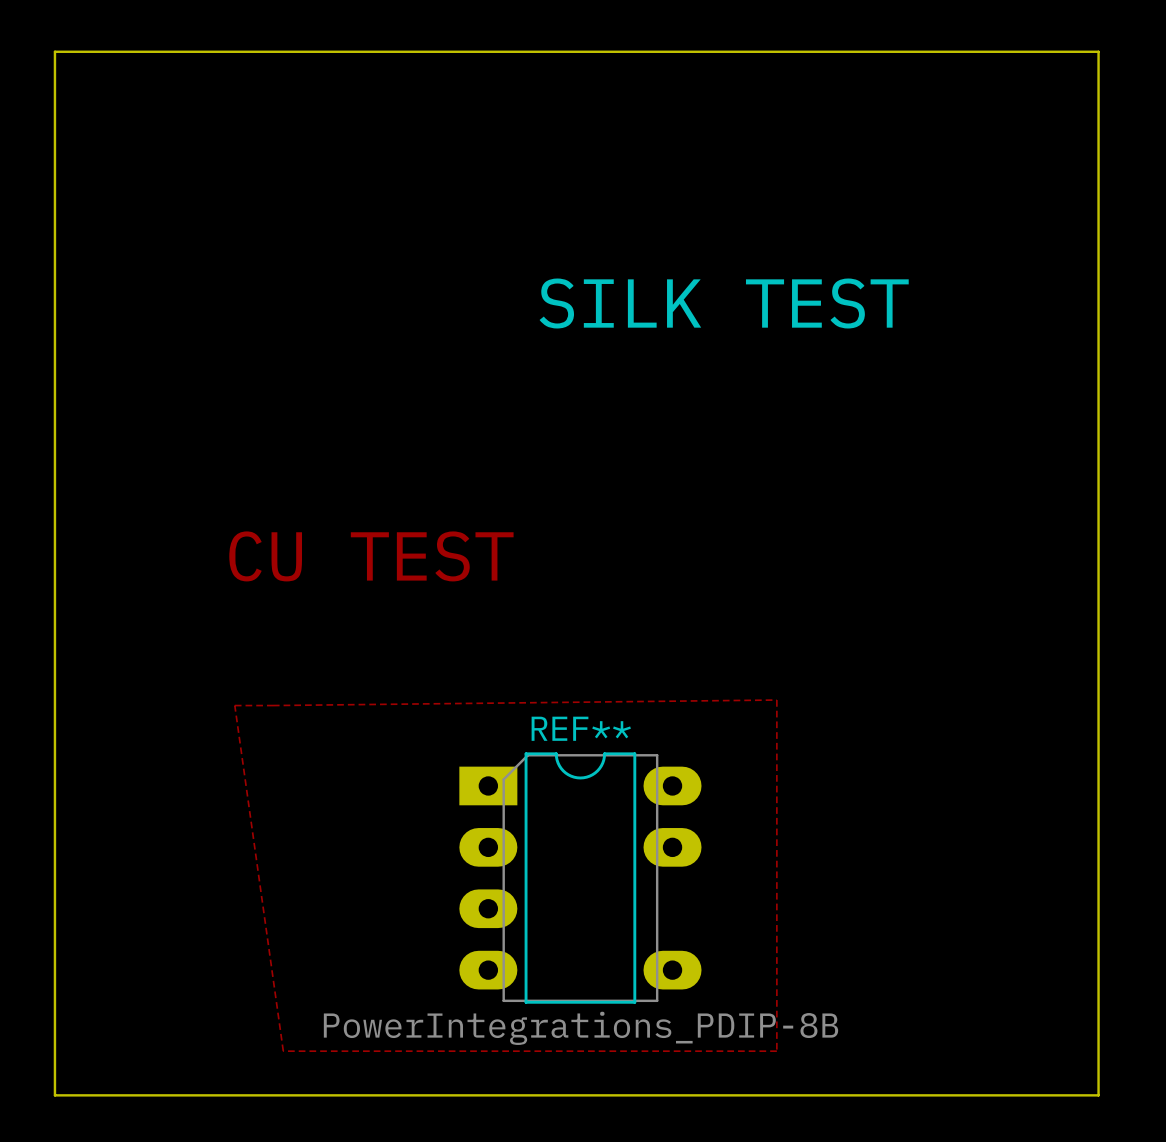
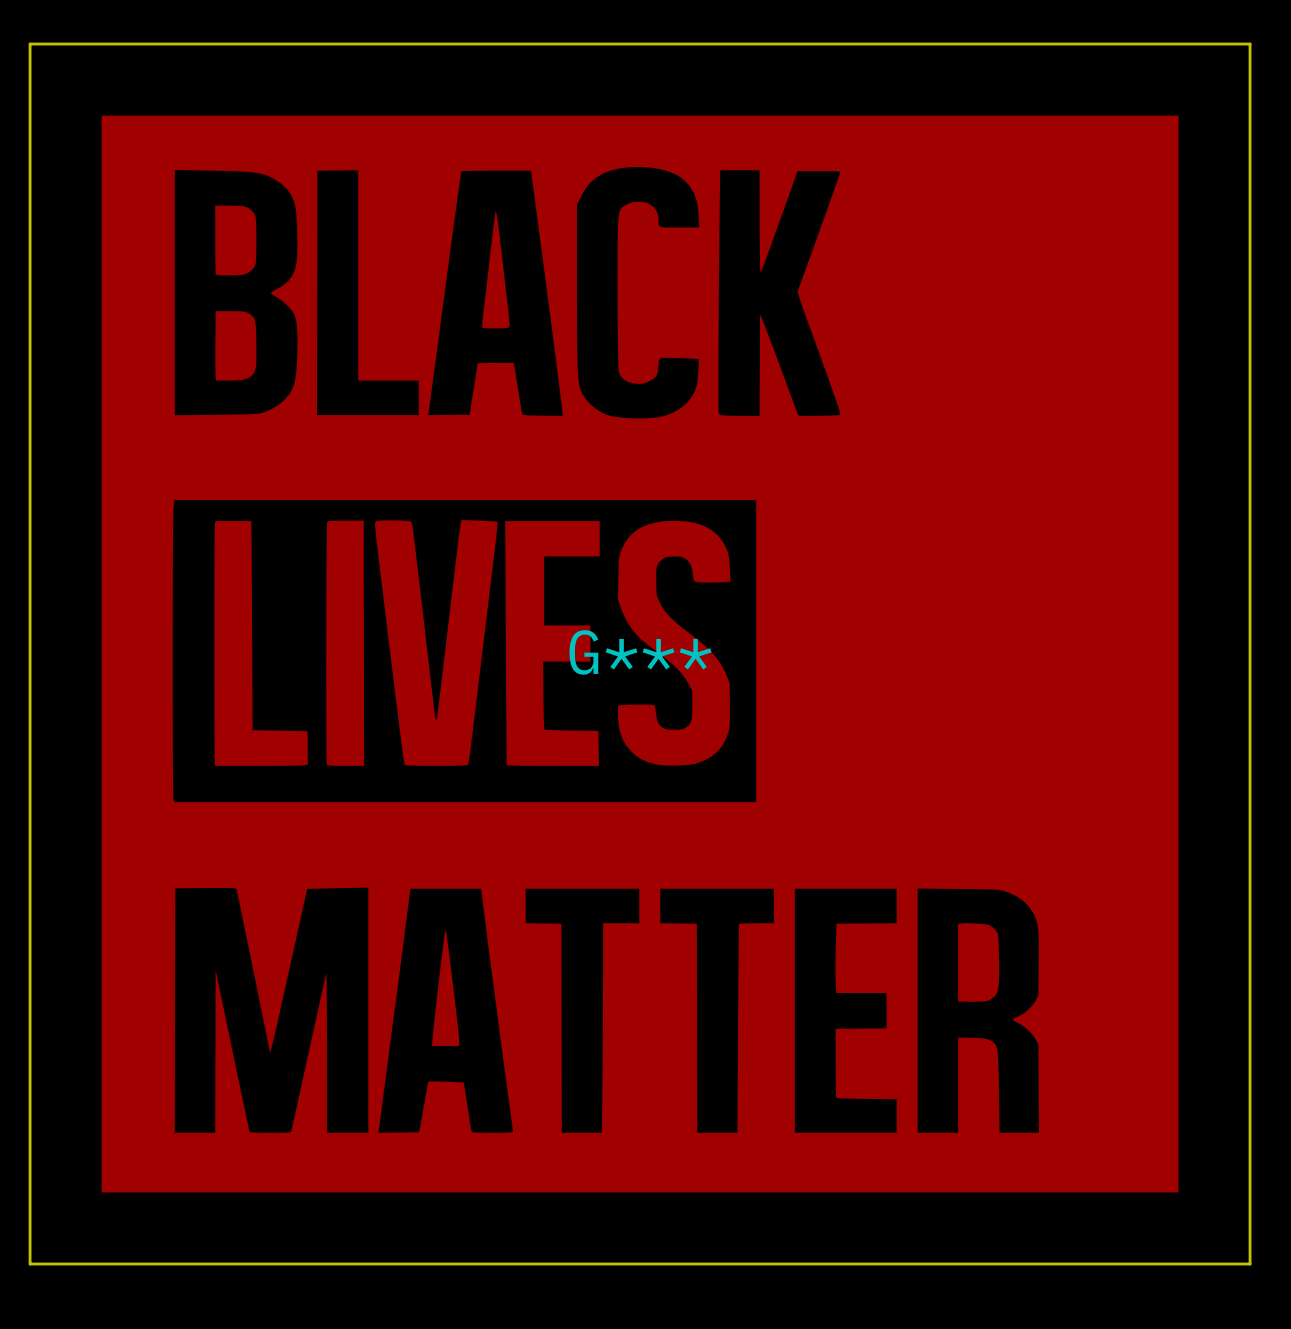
text: SILK TEST (724, 303) -> none
text: CU TEST (371, 556) -> none
G***: none -> (640, 654)
zone outline: (776, 700) (234, 705) (283, 1051) (776, 1051) (776, 700) -> none
REF**: PowerIntegrations_PDIP-8B (580, 878) -> none

